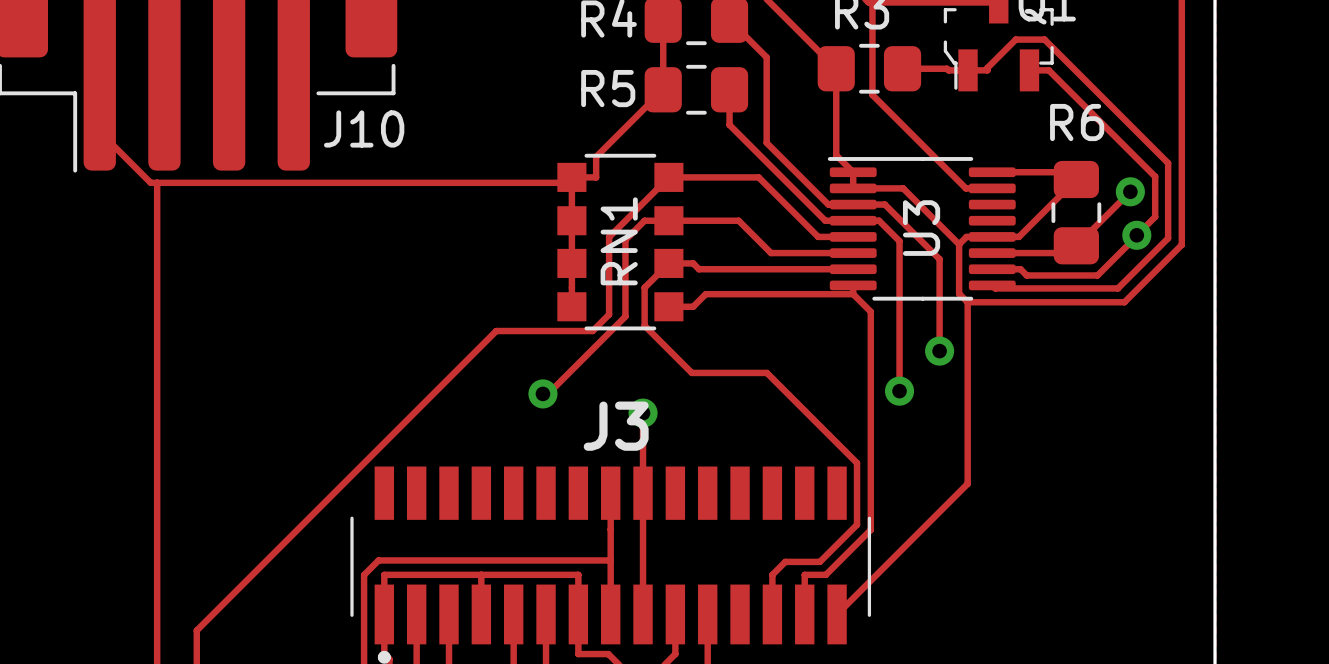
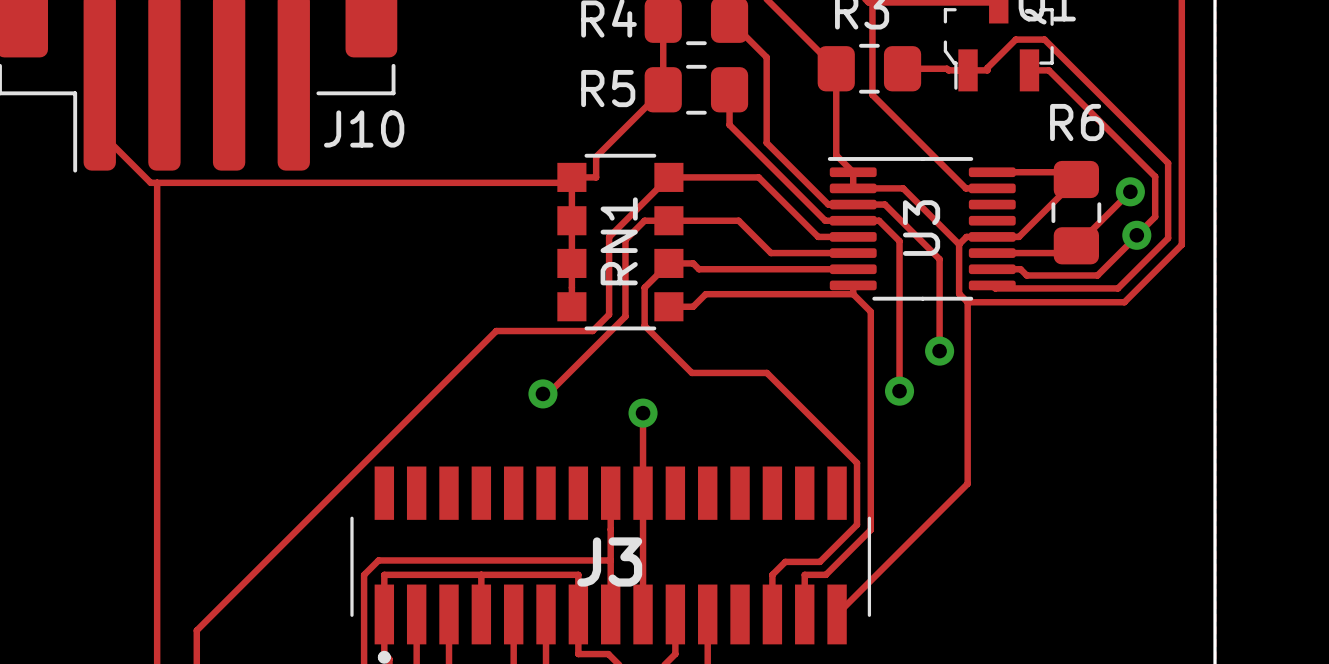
J3 name position: J3 (616, 426) -> J3 (609, 561)

